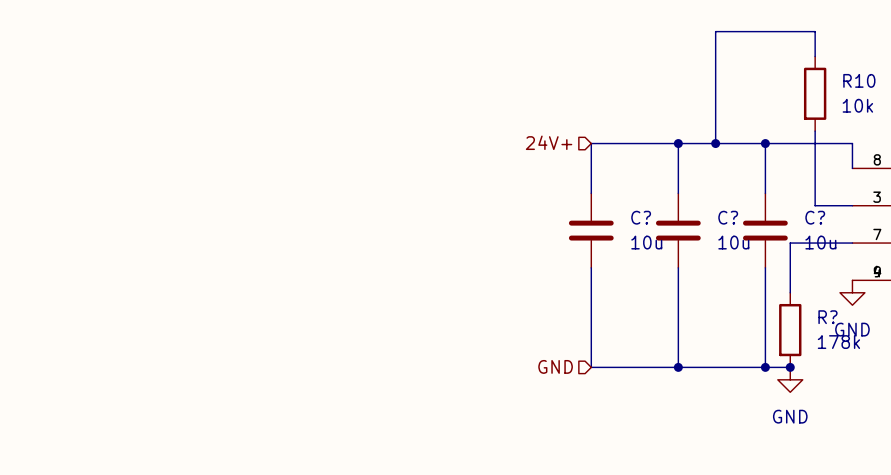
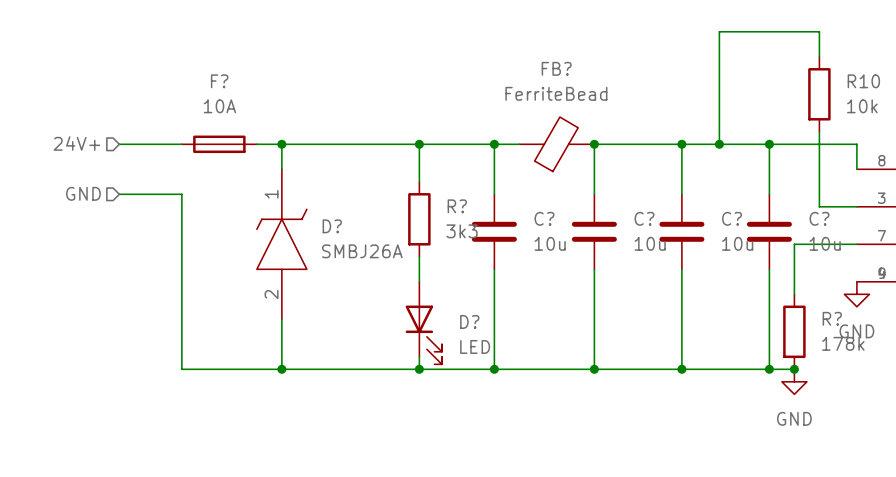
hierarchical label: none -> 24V+ (76, 143)
hierarchical label: 24V+ (549, 142) -> none
wire: none -> (119, 144) (181, 144)
F?: none -> 10A (219, 144)
wire: none -> (256, 144) (519, 144)
wire: none -> (281, 144) (281, 169)
junction: none -> (281, 144)
wire: none -> (419, 144) (419, 181)
junction: none -> (419, 144)
wire: none -> (494, 144) (494, 194)
junction: none -> (494, 144)
FB?: none -> FerriteBead (556, 144)
junction: none -> (594, 144)
hierarchical label: none -> GND (83, 193)
wire: none -> (119, 194) (181, 194) (181, 369) (594, 369)
R?: none -> 3k3 (419, 219)
C?: none -> 10u (494, 231)
D?: none -> SMBJ26A (281, 244)
wire: none -> (419, 256) (419, 281)
wire: none -> (494, 269) (494, 369)
wire: none -> (281, 319) (281, 369)
D?: none -> LED (423, 323)
wire: none -> (419, 356) (419, 369)
hierarchical label: GND (555, 366) -> none
junction: none -> (281, 369)
junction: none -> (419, 369)
junction: none -> (494, 369)
junction: none -> (594, 369)

